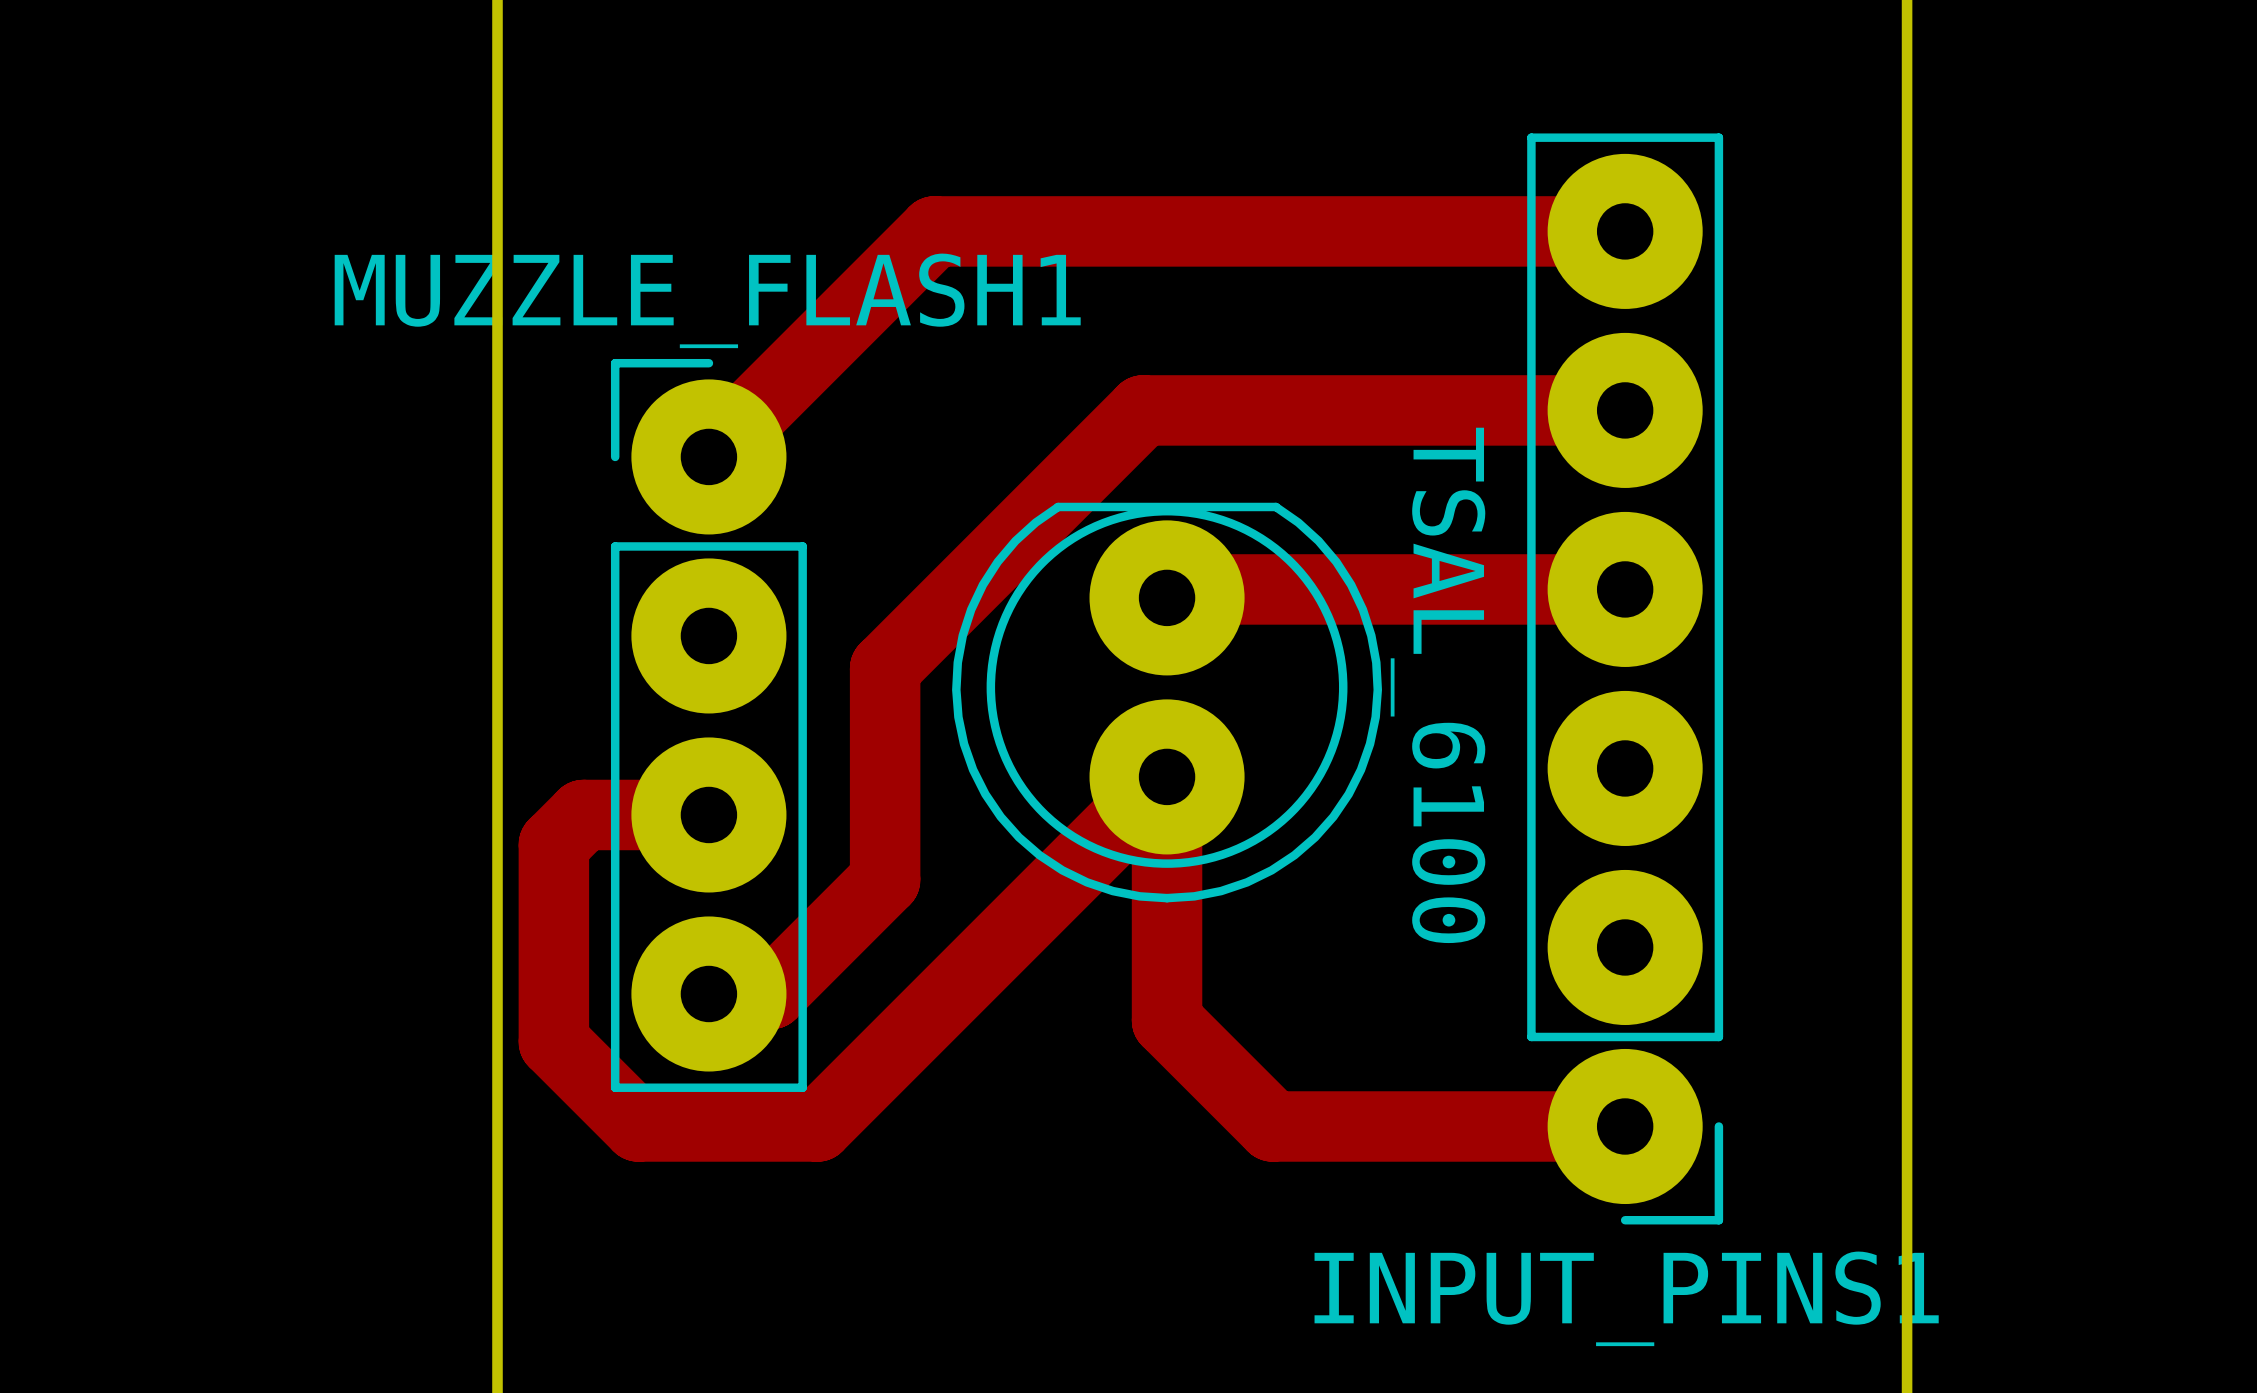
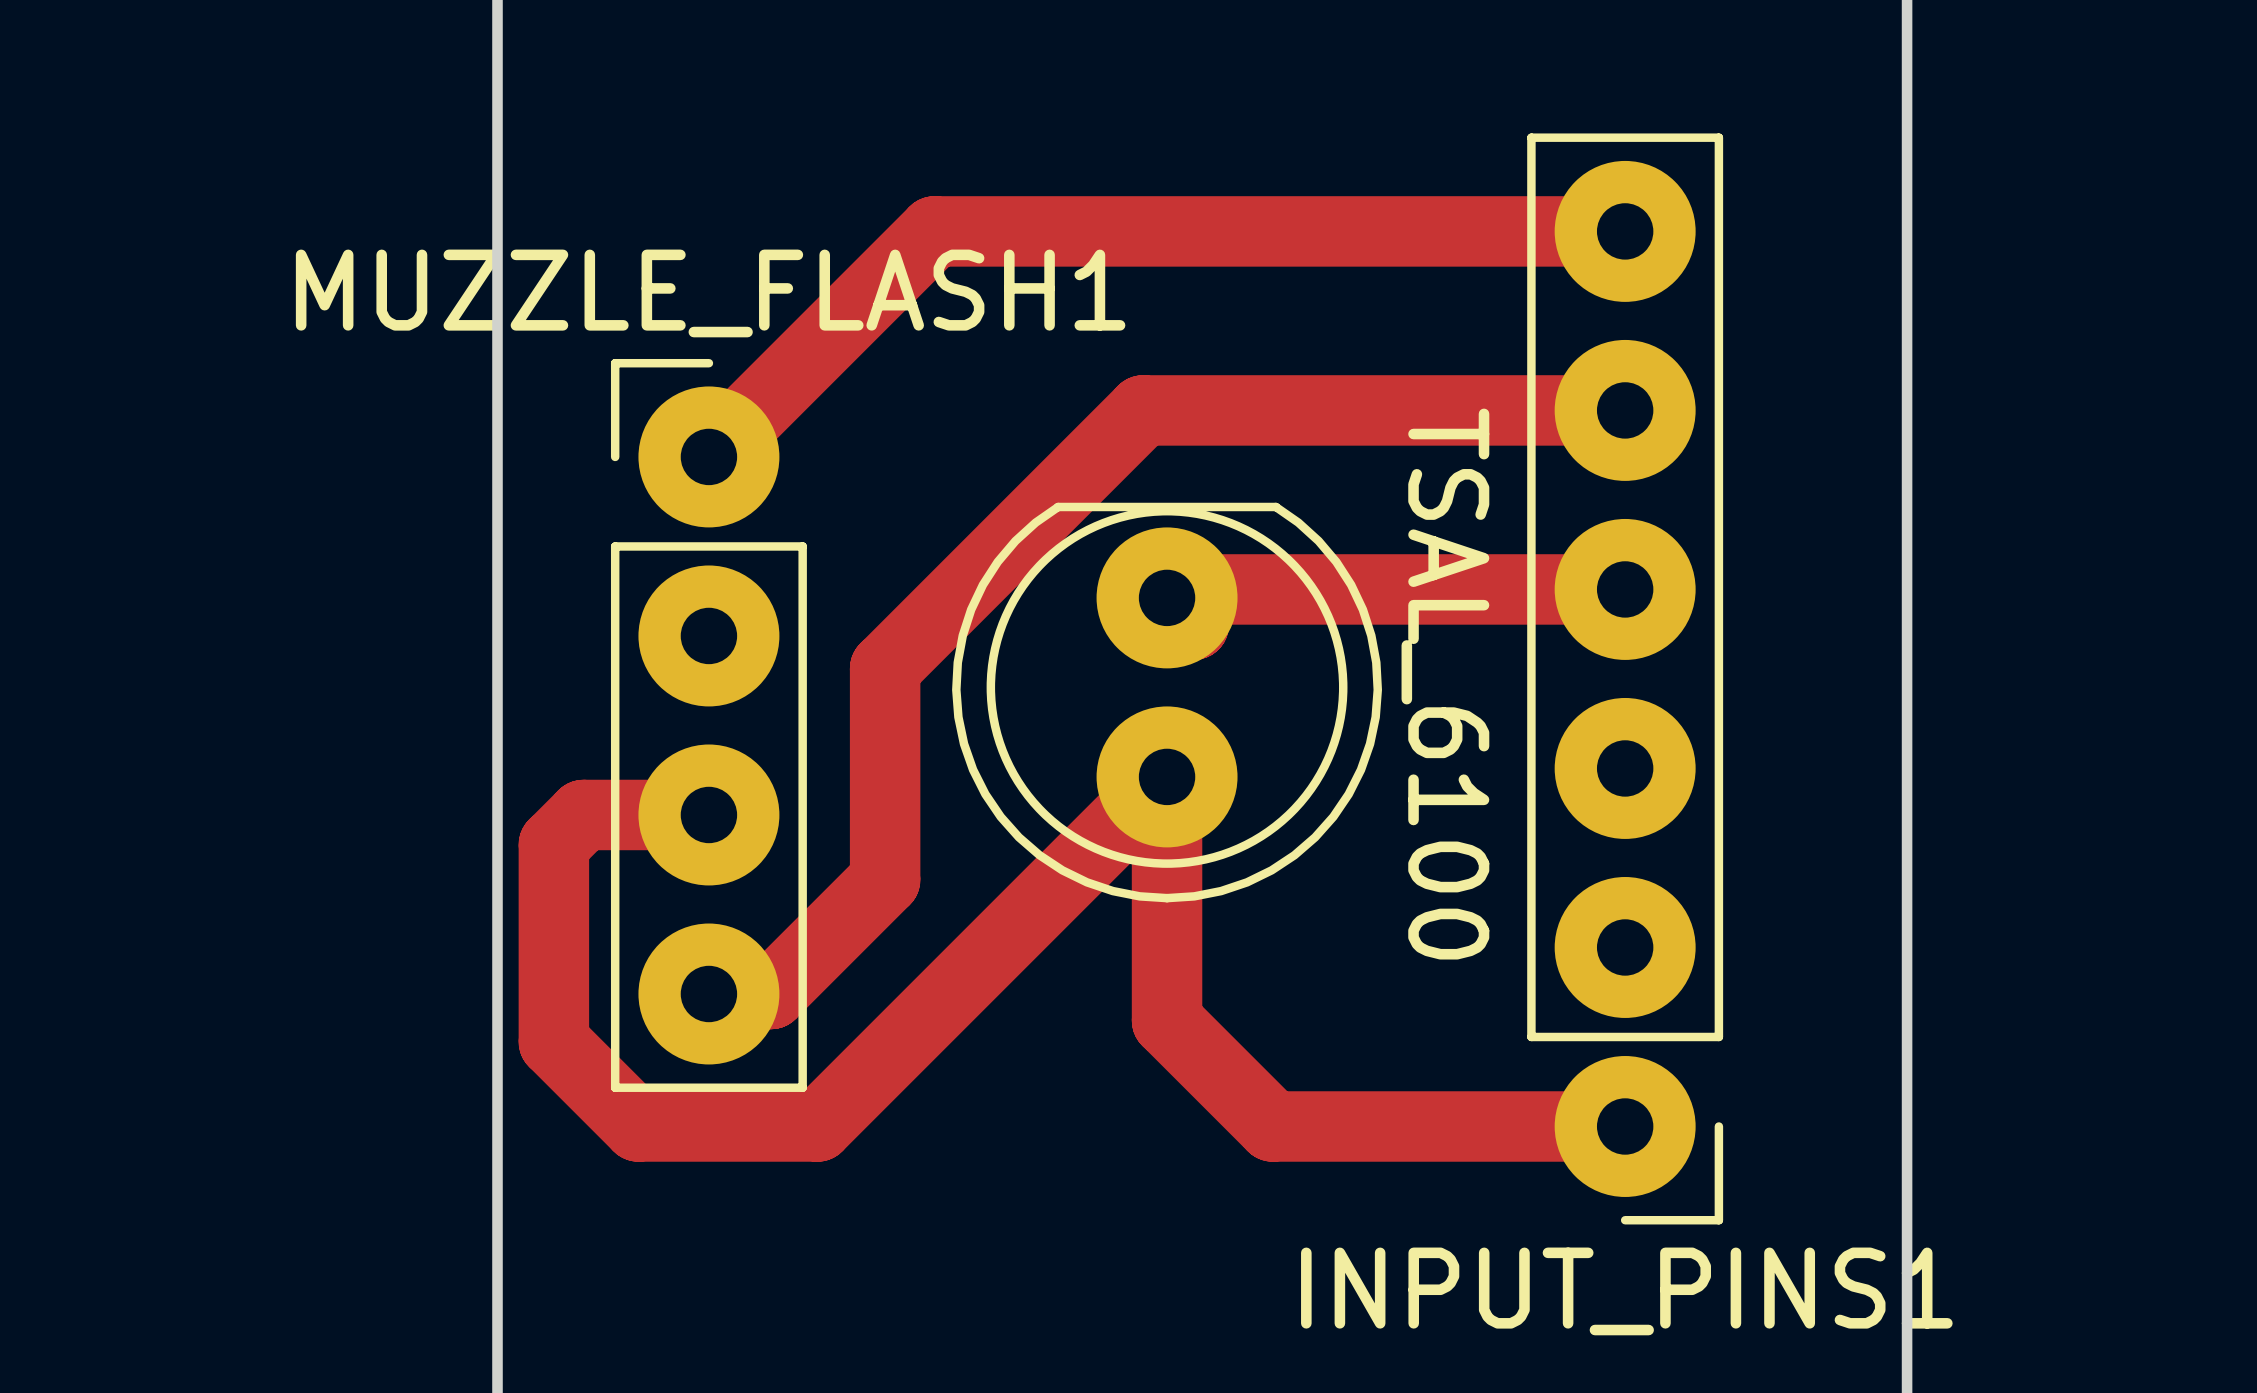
INPUT_PINS1 footprint: [1527, 133, 1724, 1225] -> [1527, 133, 1724, 1225]
MUZZLE_FLASH1 footprint: [610, 358, 807, 1092] -> [610, 358, 807, 1092]
TSAL_6100 footprint: [952, 502, 1382, 903] -> [952, 502, 1382, 903]

